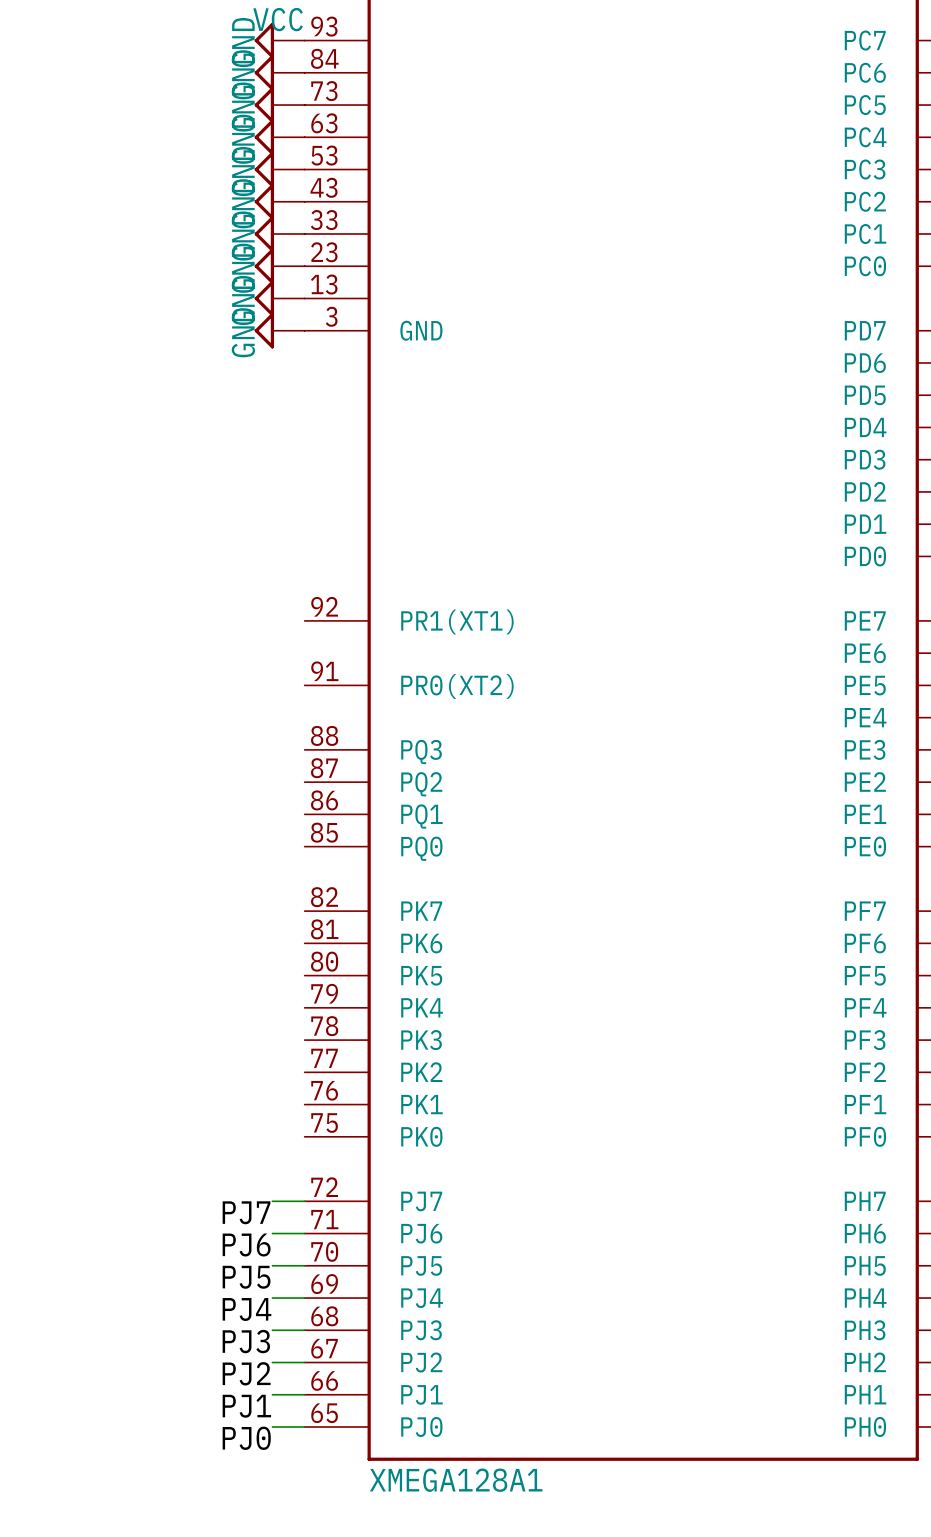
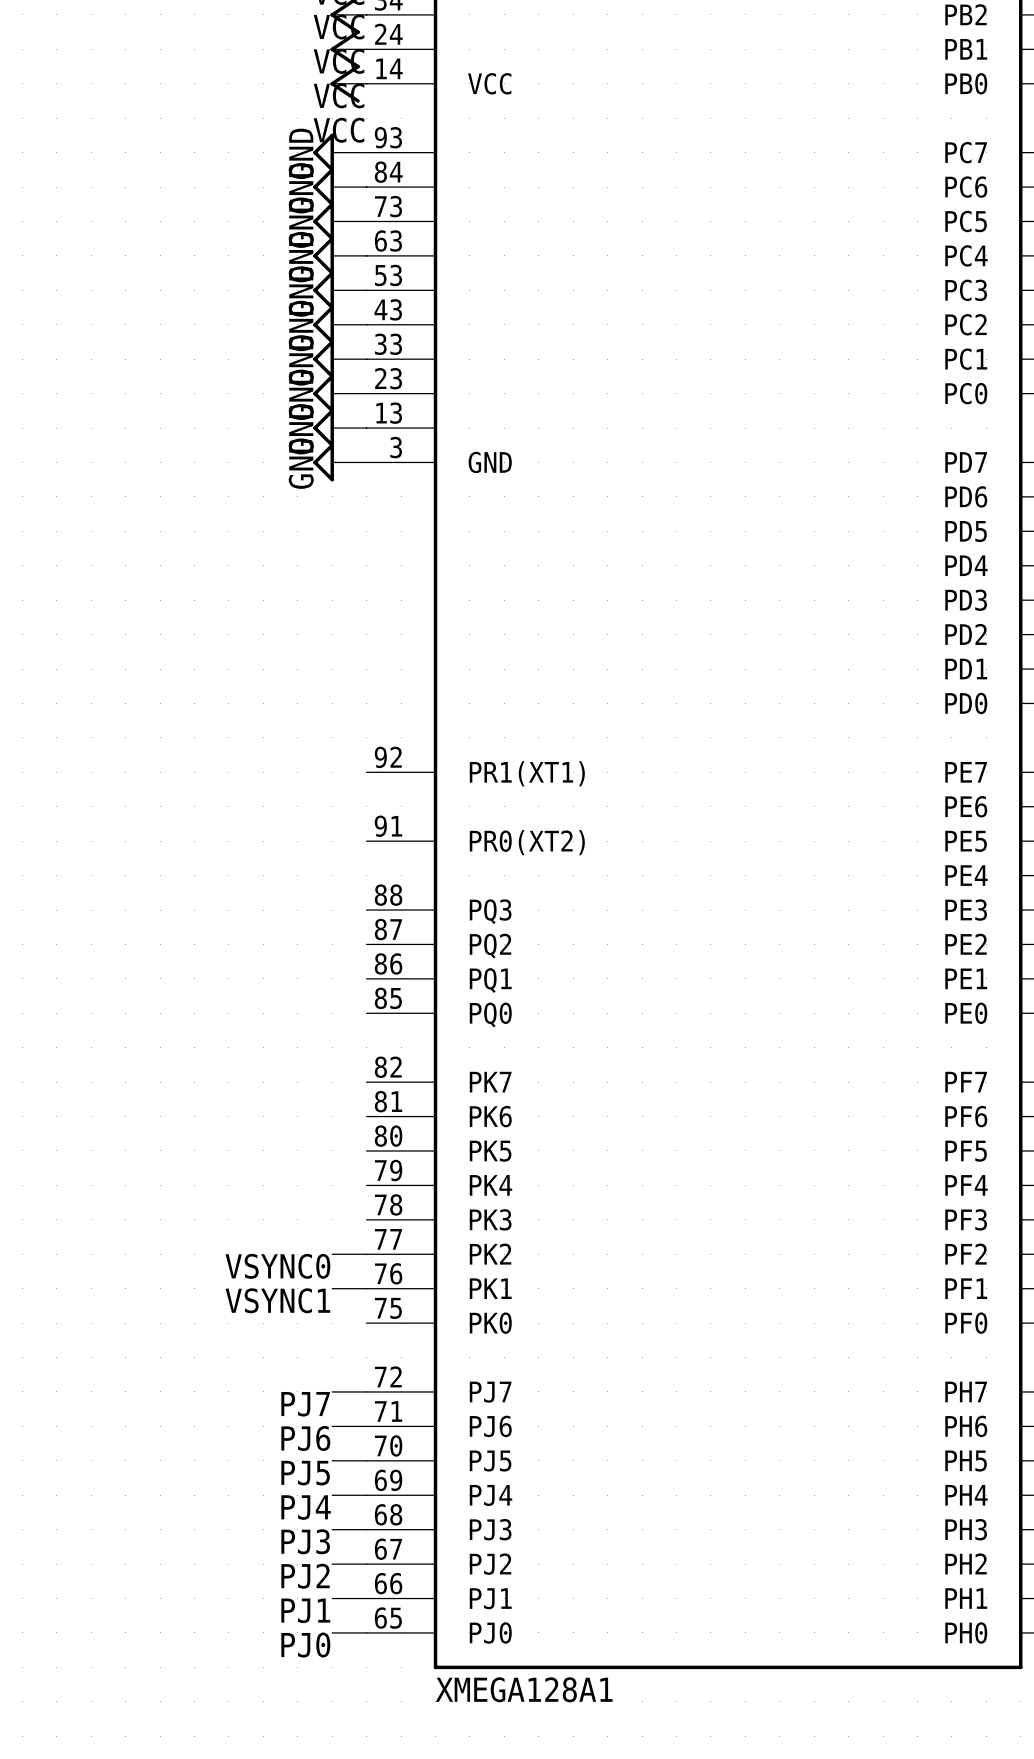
wire: none -> (332, 1254) (366, 1254)
label: none -> VSYNC0 (277, 1266)
wire: none -> (332, 1288) (366, 1288)
label: none -> VSYNC1 (277, 1300)

